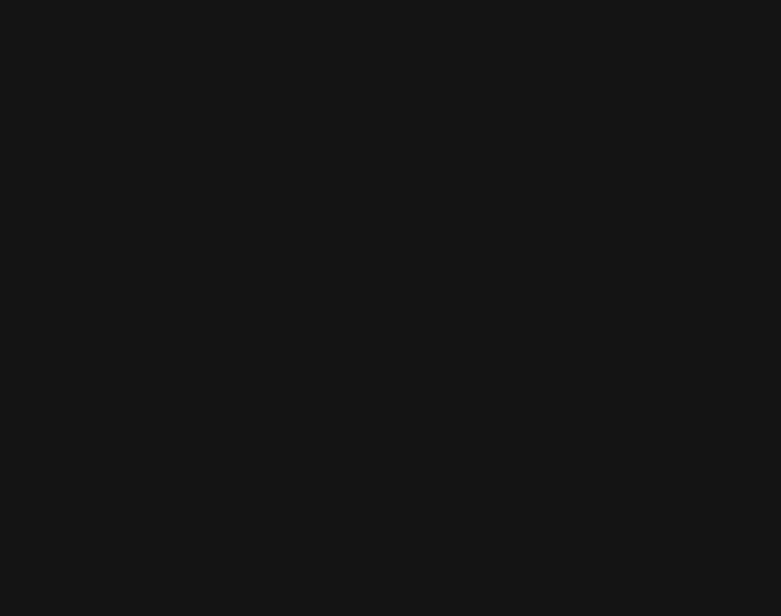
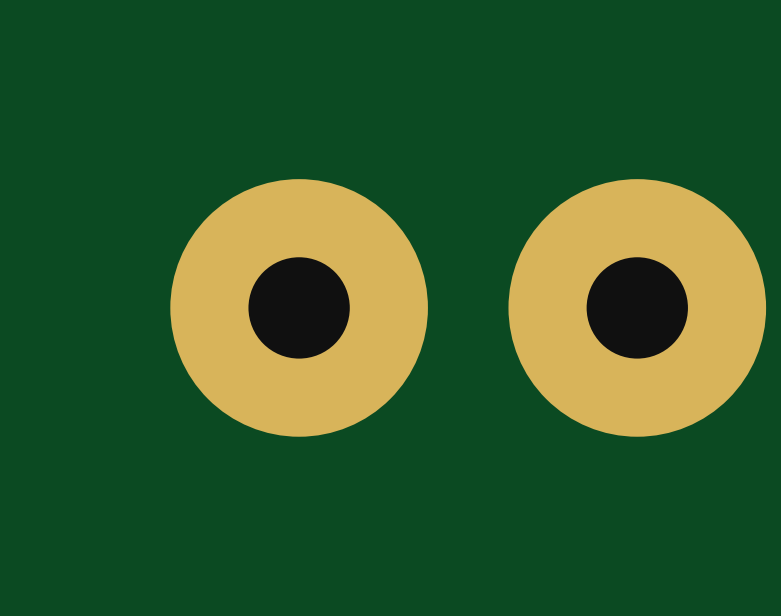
part: none -> (468, 307)

